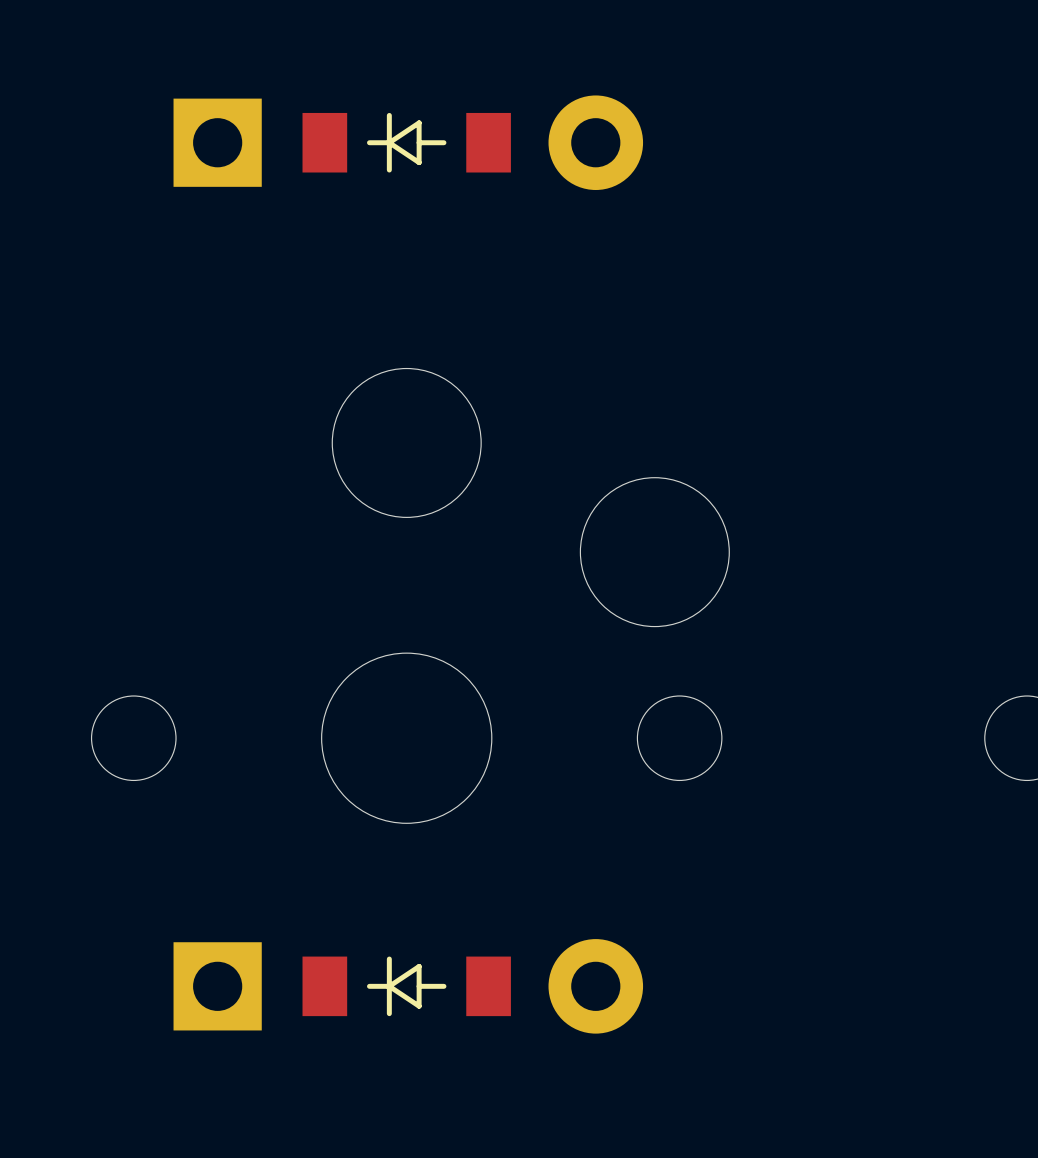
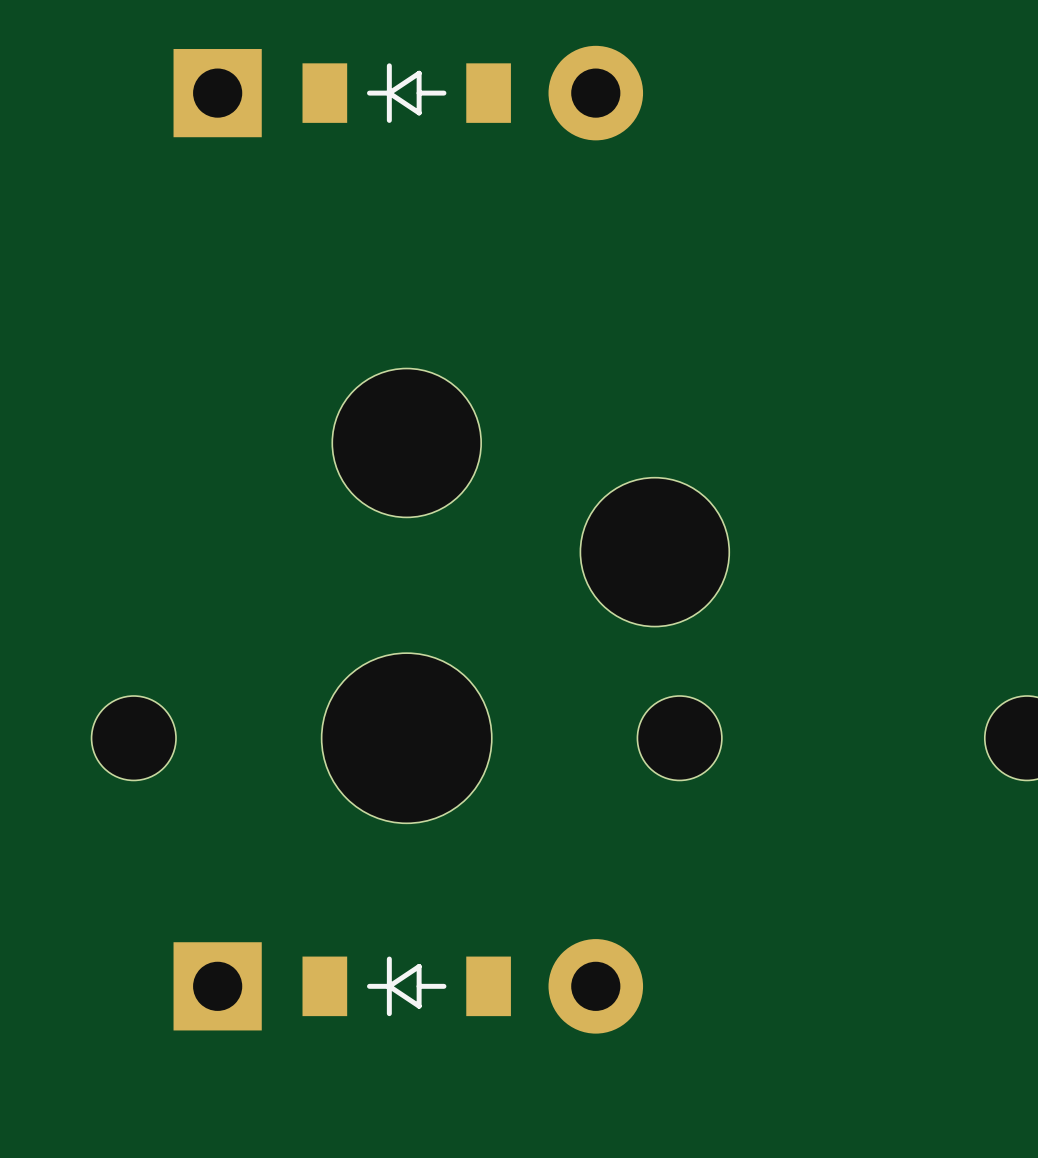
part position: (408, 142) -> (408, 93)

